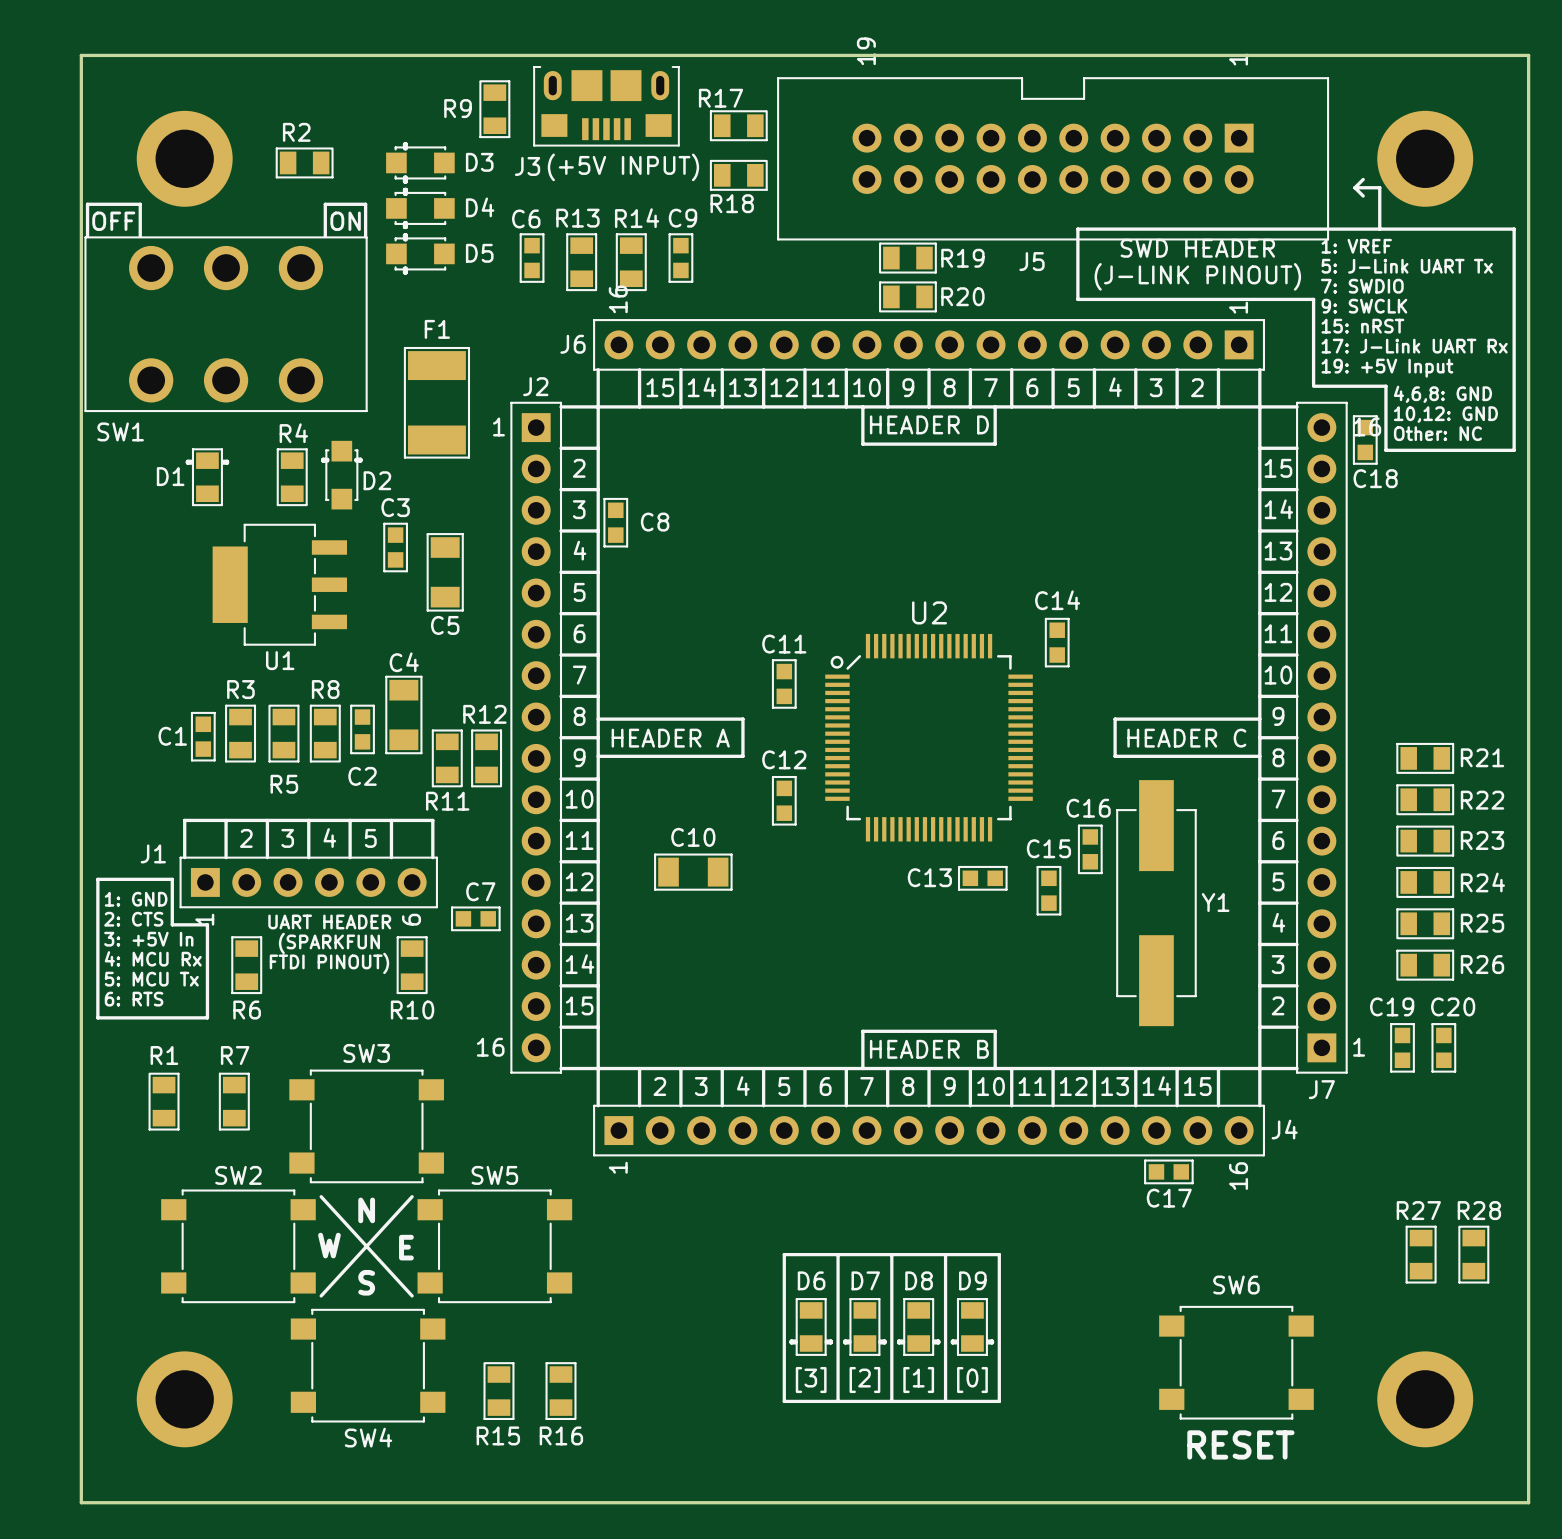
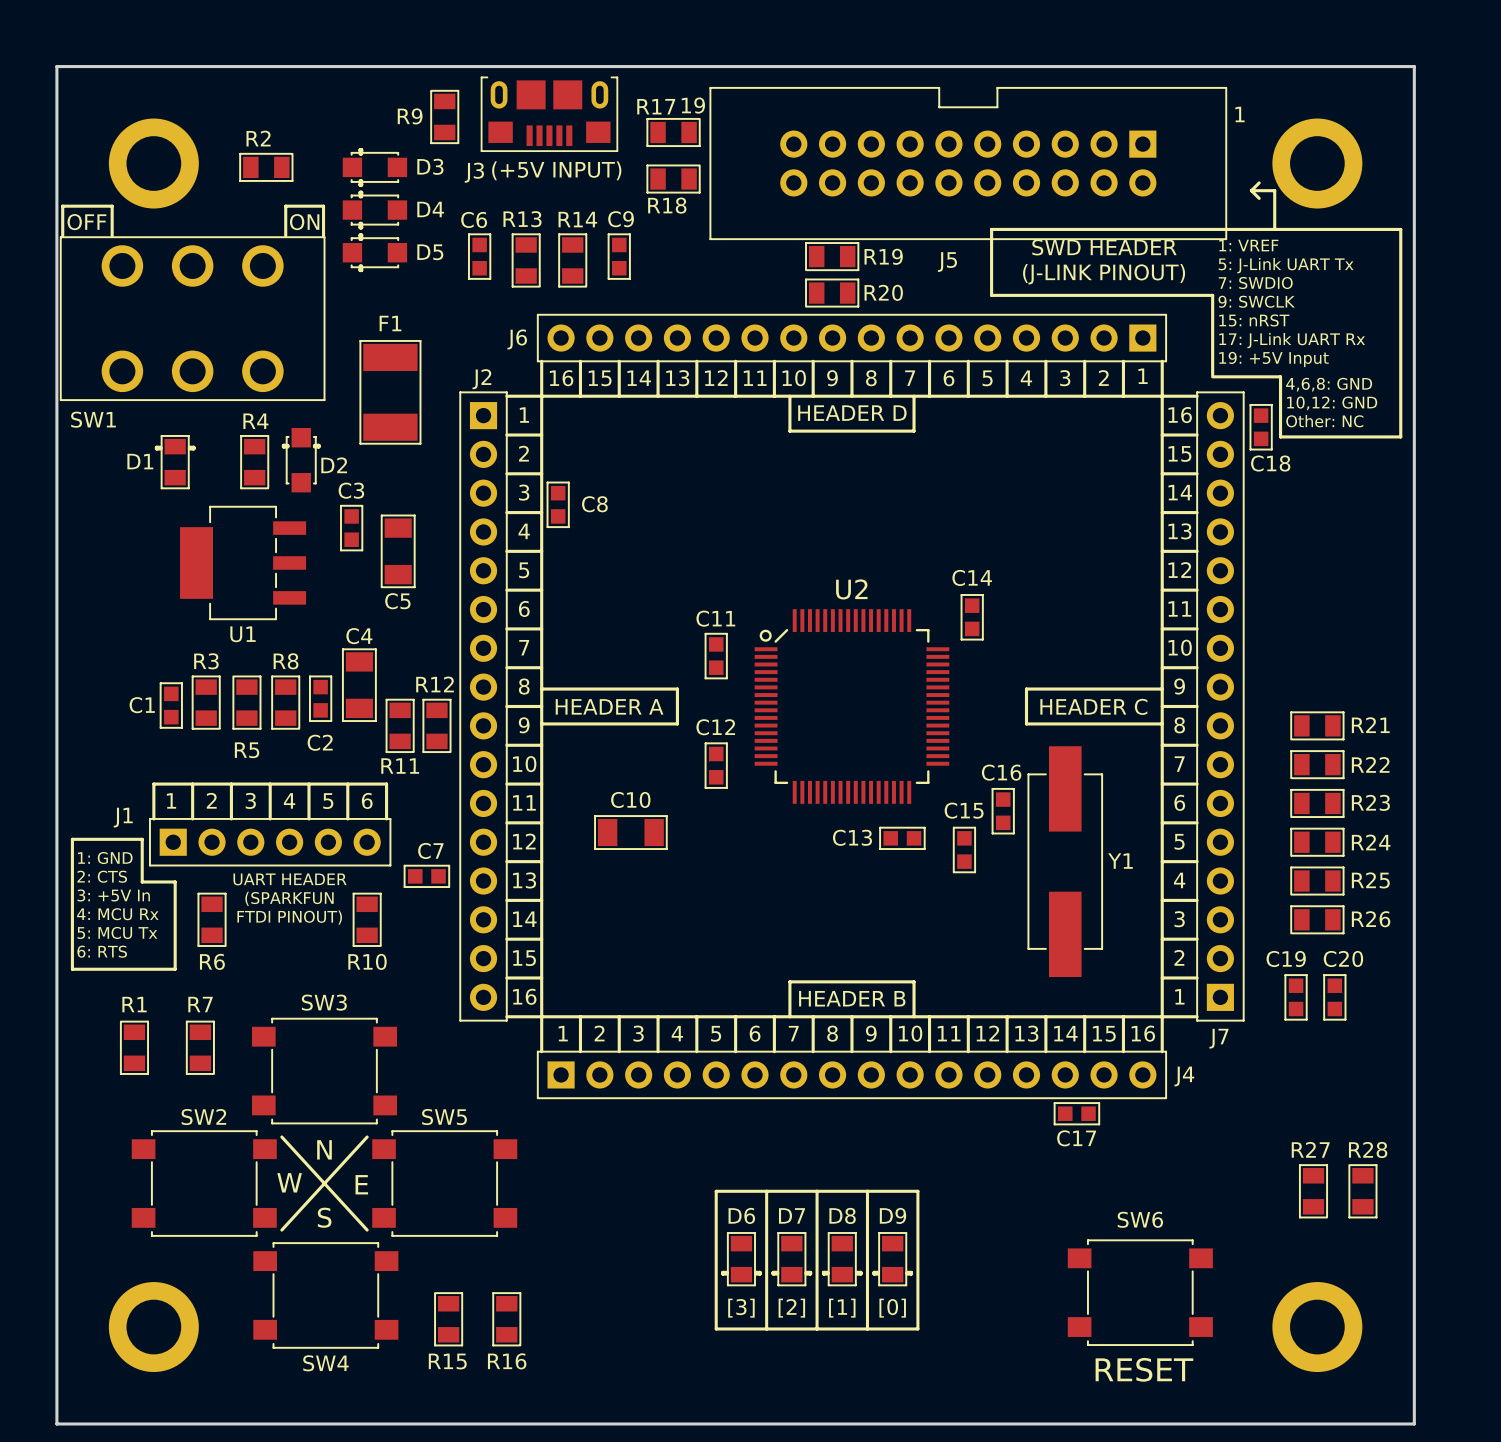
J5 footprint: [777, 77, 1330, 241] -> [709, 86, 1228, 241]
J6 footprint: [593, 319, 1266, 371] -> [536, 313, 1168, 363]
J2 footprint: [510, 401, 563, 1074] -> [459, 391, 508, 1022]
J7 footprint: [1296, 401, 1348, 1074] -> [1196, 391, 1245, 1022]
J1 footprint: [179, 856, 438, 909] -> [149, 817, 392, 867]
J4 footprint: [593, 1104, 1266, 1157] -> [536, 1050, 1168, 1100]

